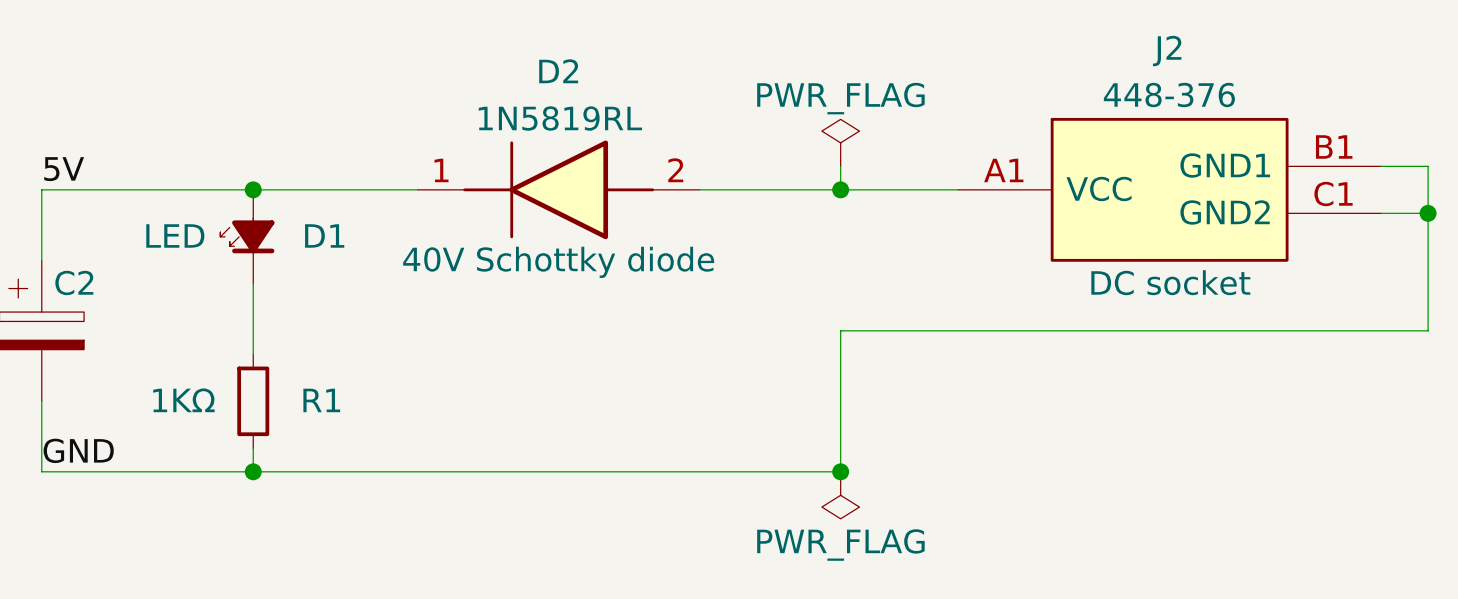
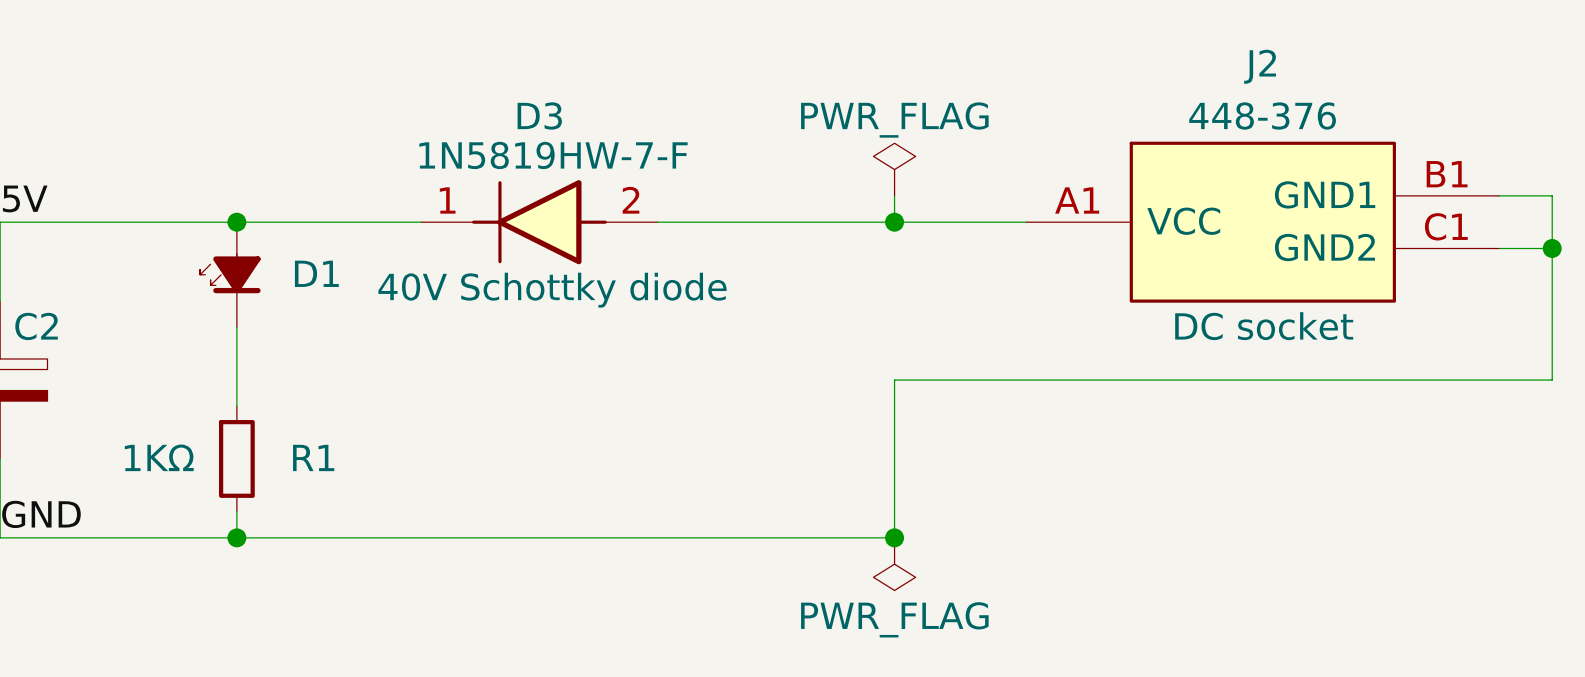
D3: none -> 1N5819HW-7-F (539, 222)
D2: 1N5819RL (558, 189) -> none
D1 value: LED (175, 235) -> none

